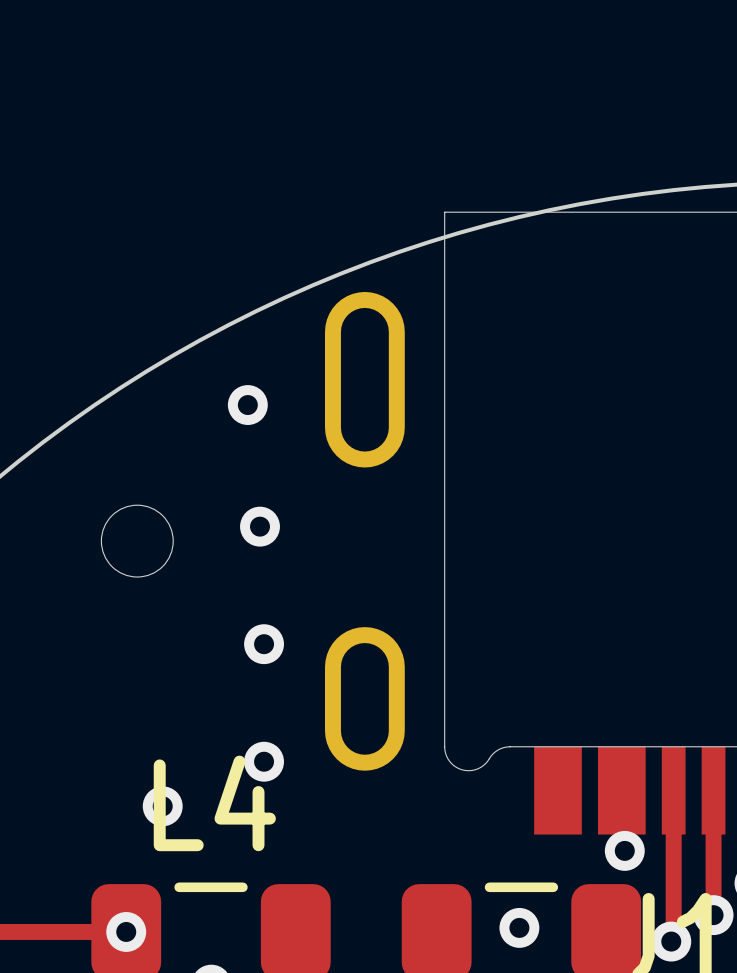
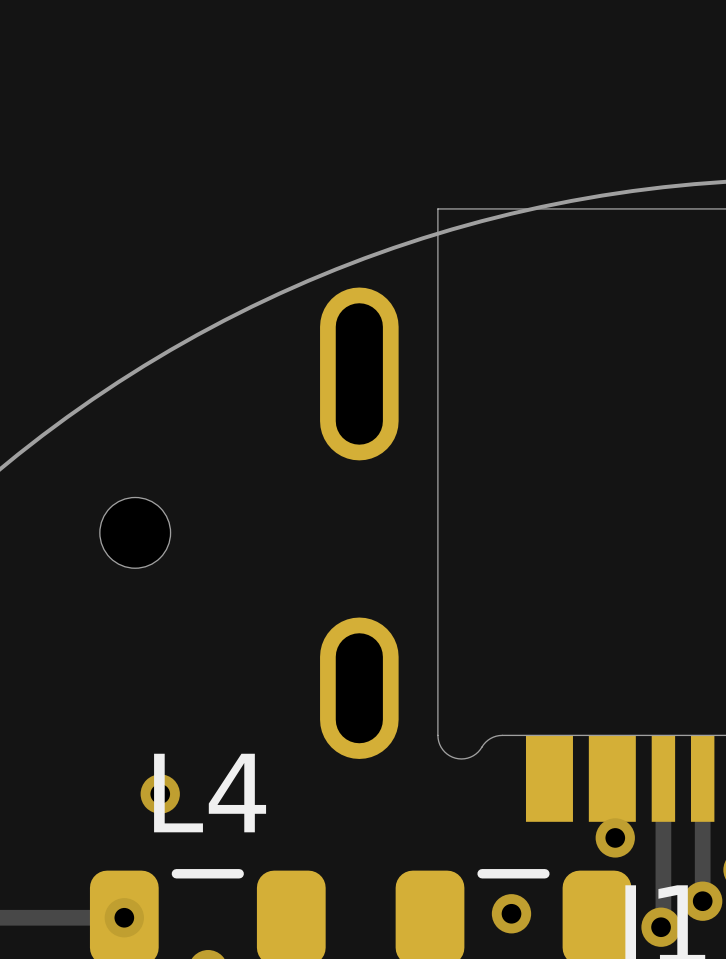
via: (247, 405) -> none
via: (260, 526) -> none
via: (264, 644) -> none
via: (264, 761) -> none

